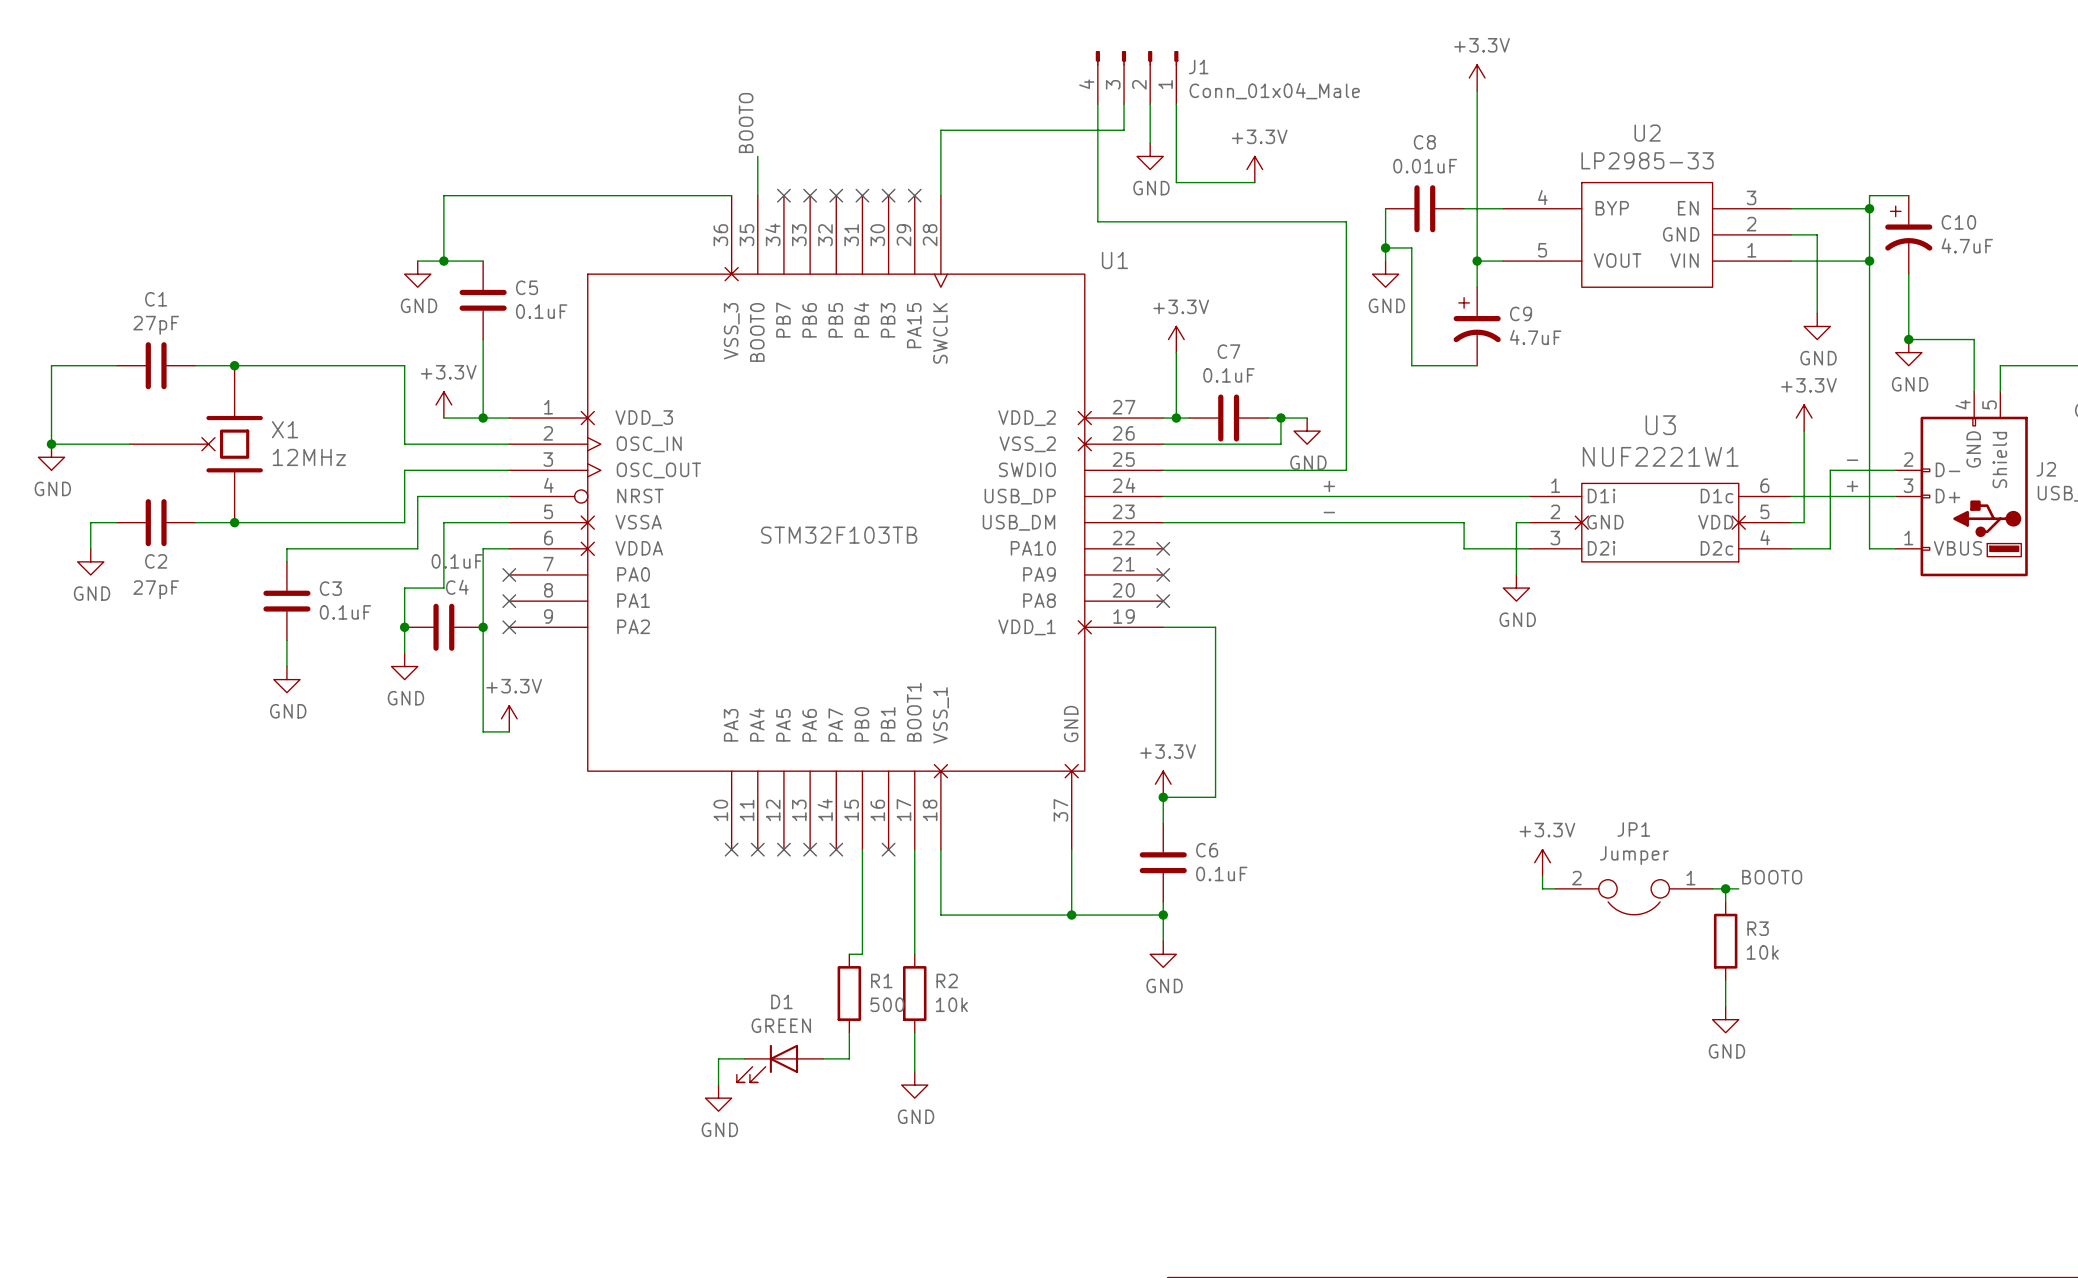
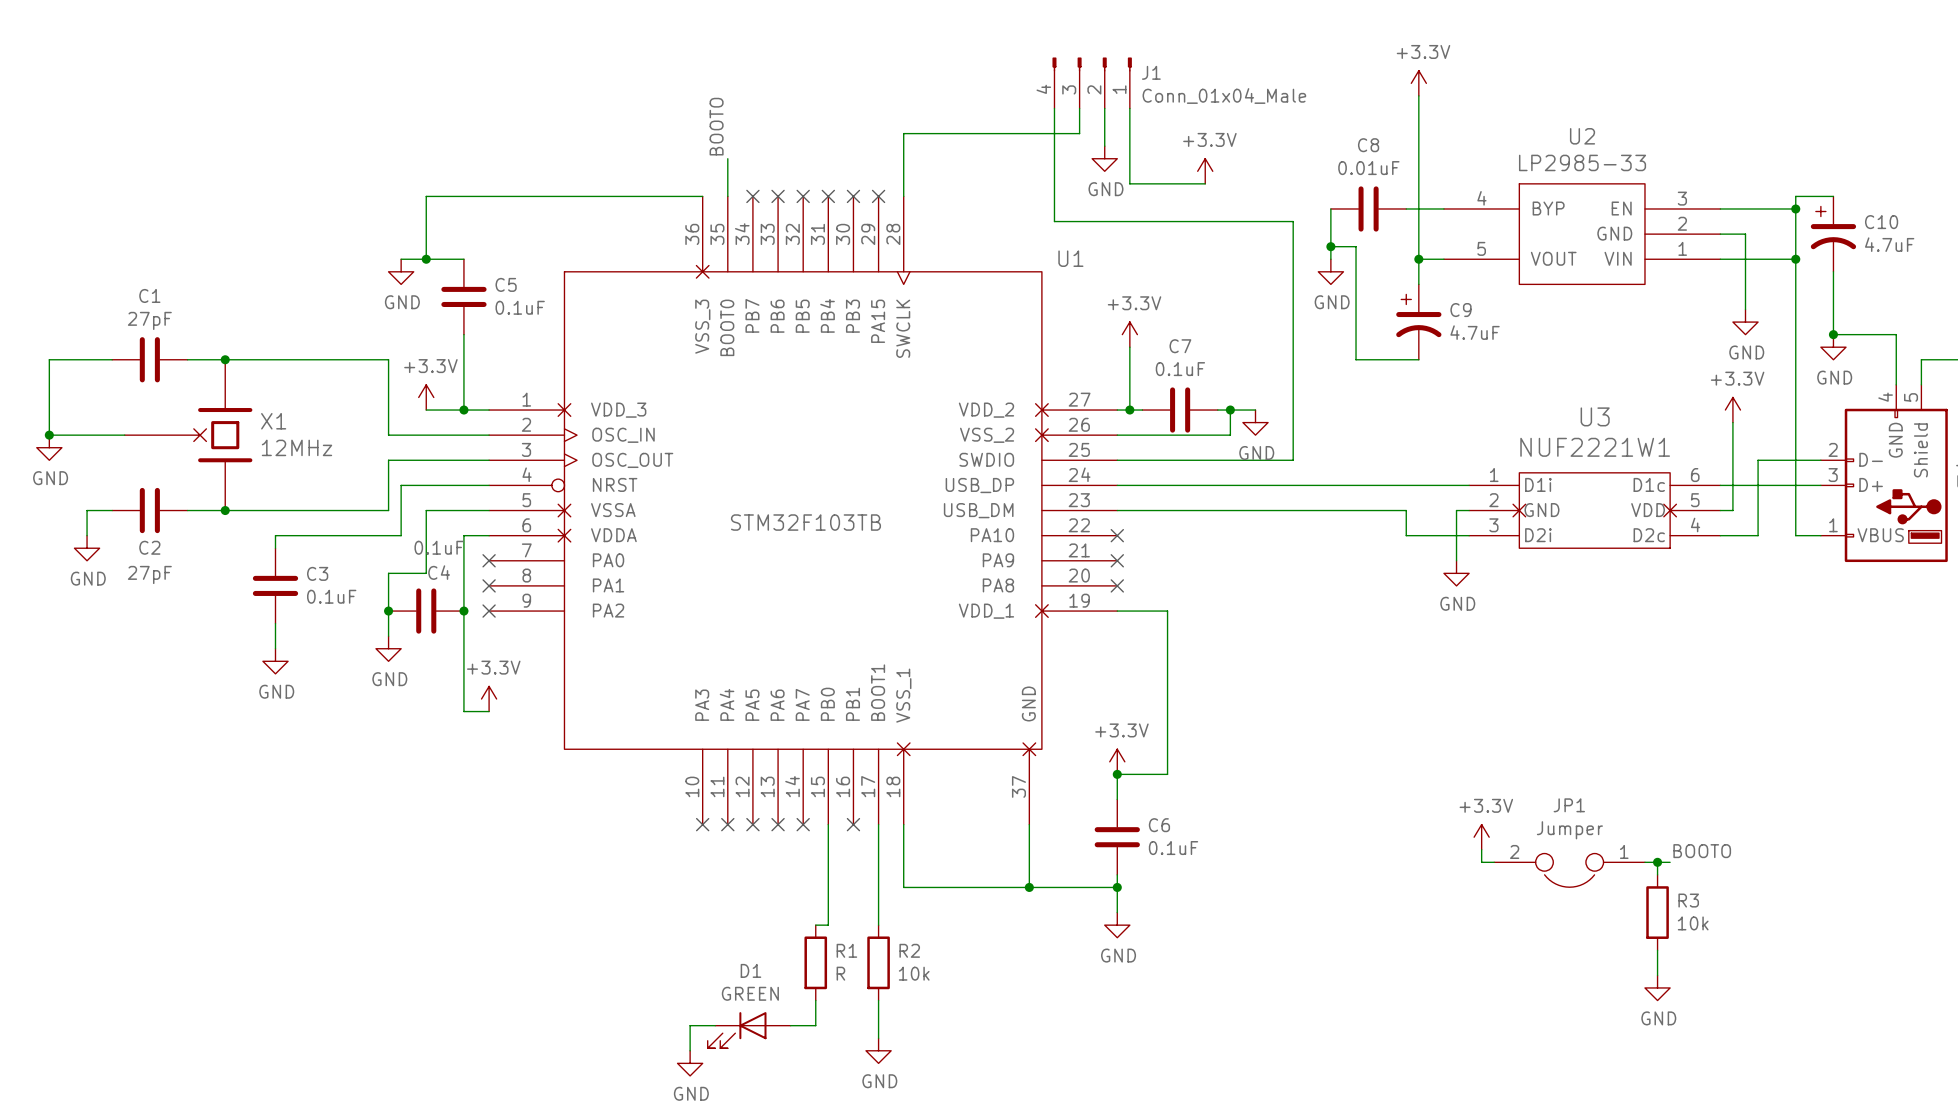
label: - (1852, 460) -> none
label: + (1329, 486) -> none
label: + (1852, 486) -> none
label: - (1329, 512) -> none
R1 value: 500 (887, 1004) -> R (840, 973)

